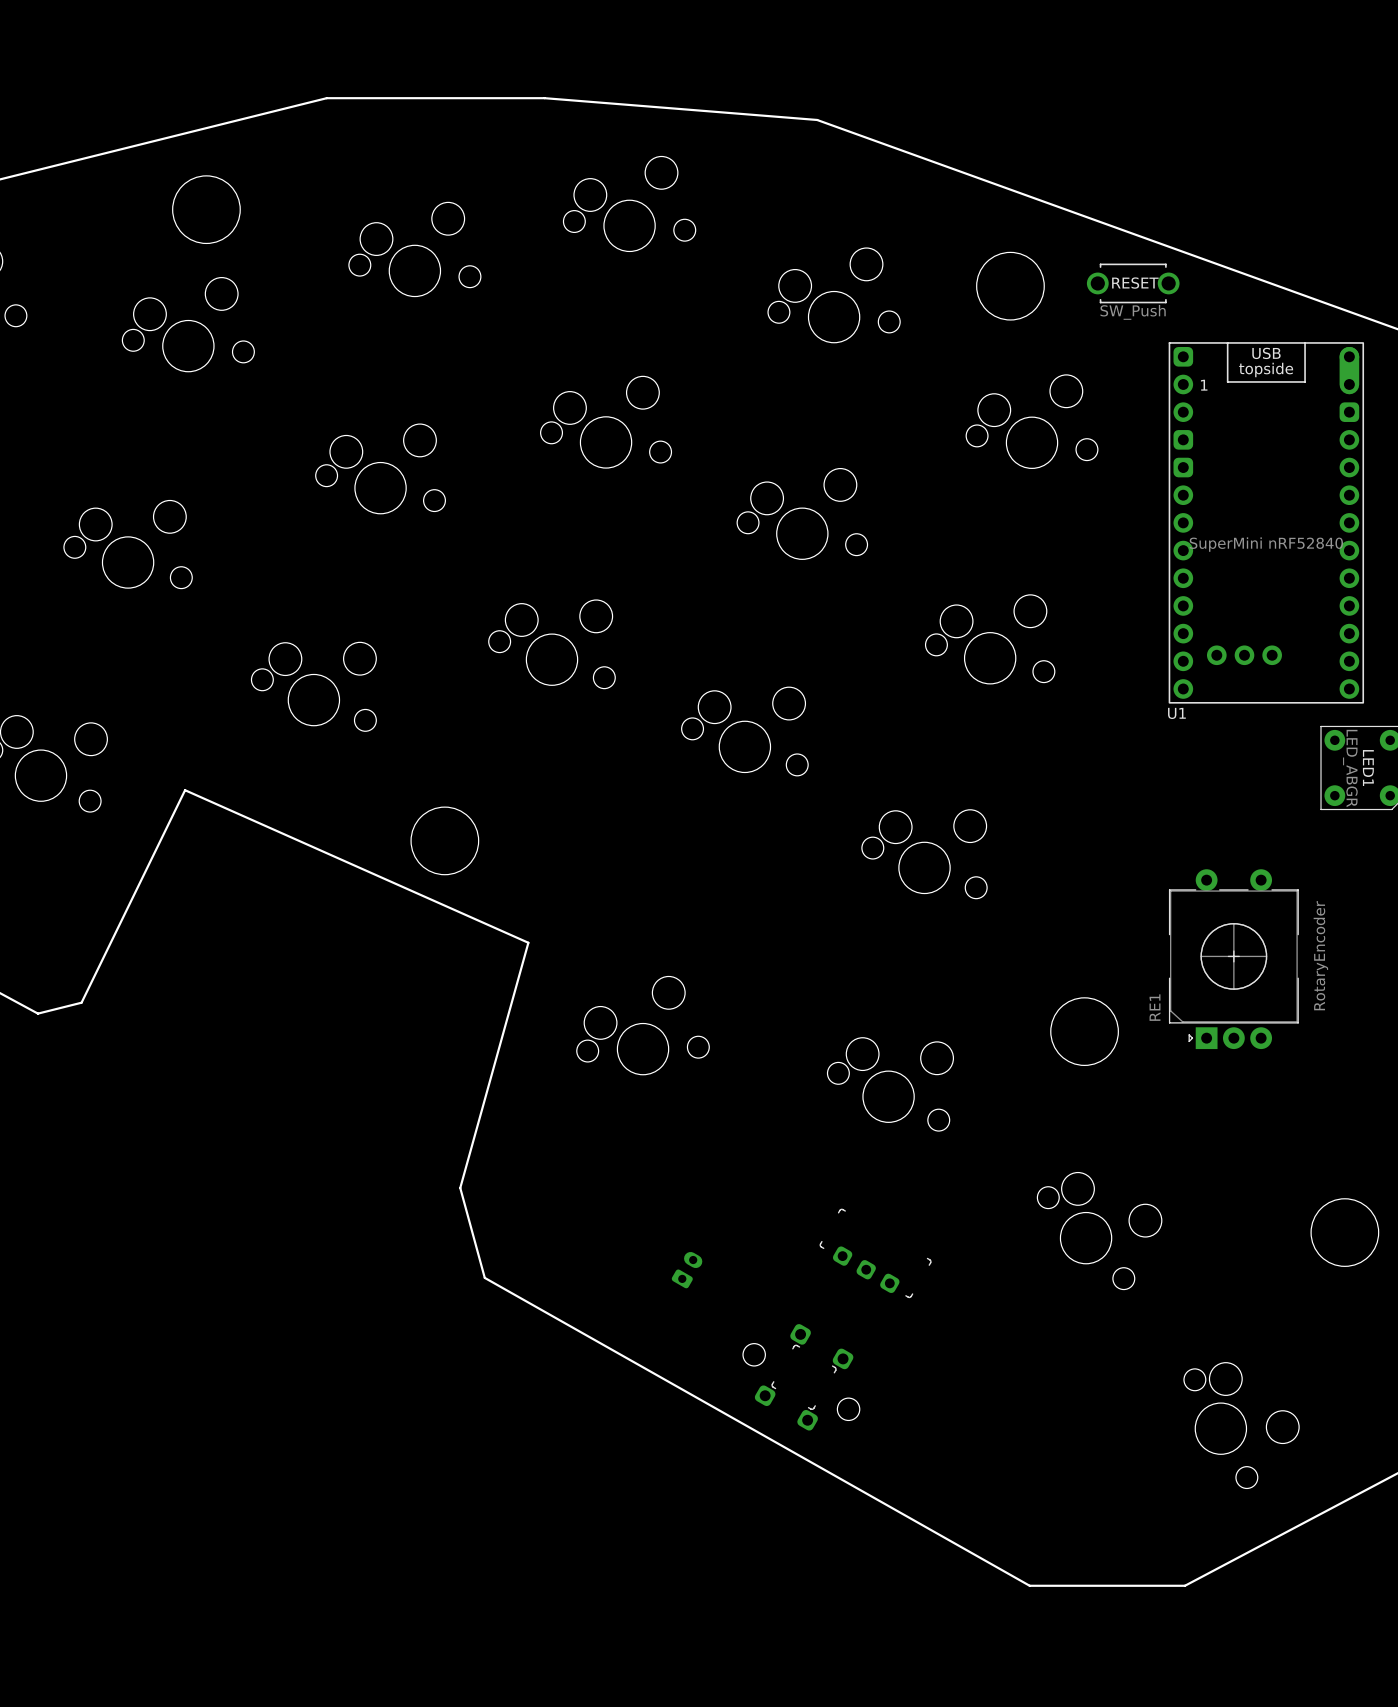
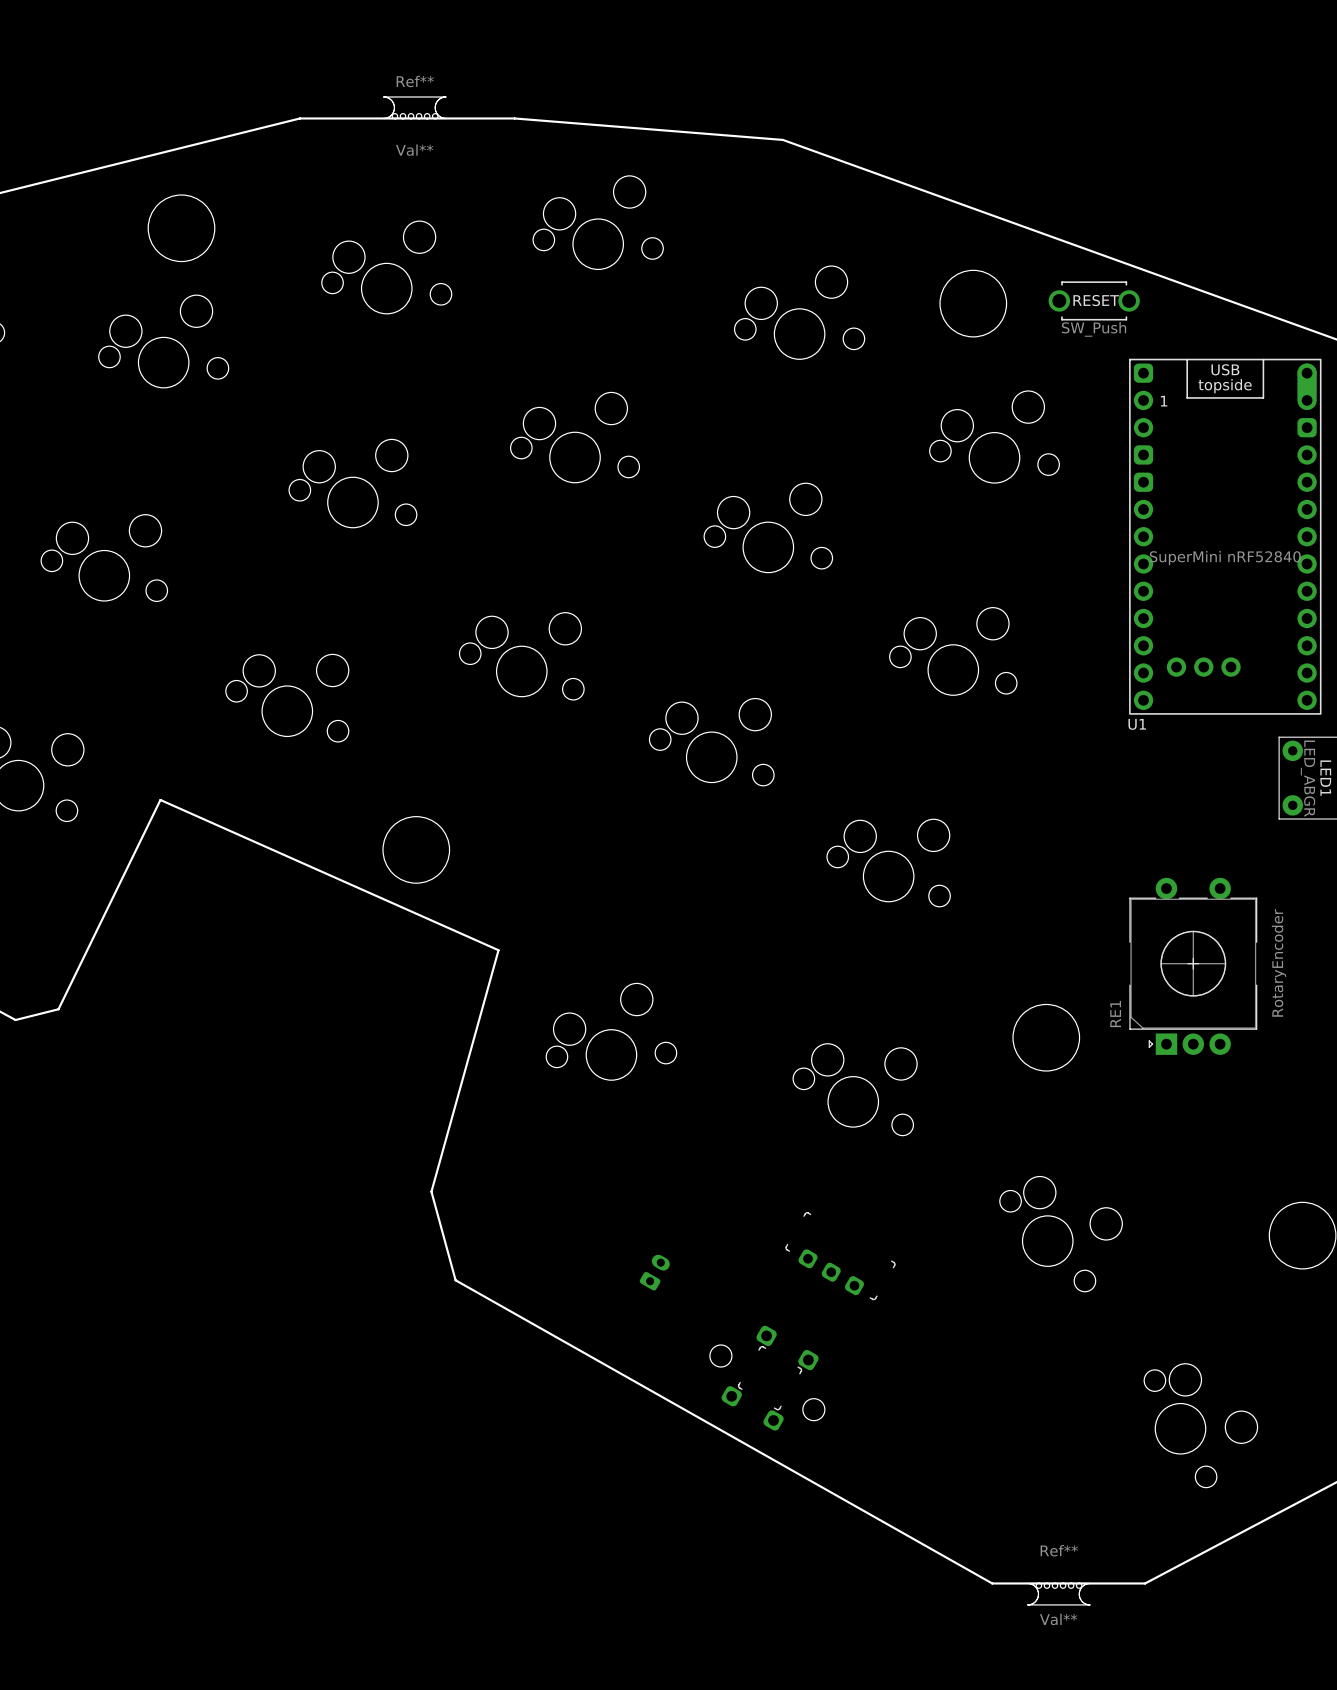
board edge: none -> (383, 97) (391, 100) (394, 107) (390, 115) (383, 118) (445, 118) (437, 114) (435, 107) (437, 100) (445, 97) (383, 97)
Ref**: none -> Val** (415, 116)
board edge: none -> (1027, 1583) (1090, 1583) (1082, 1586) (1079, 1594) (1082, 1601) (1090, 1604) (1027, 1604) (1035, 1601) (1038, 1594) (1035, 1586) (1027, 1583)
Ref**: none -> Val** (1059, 1585)

